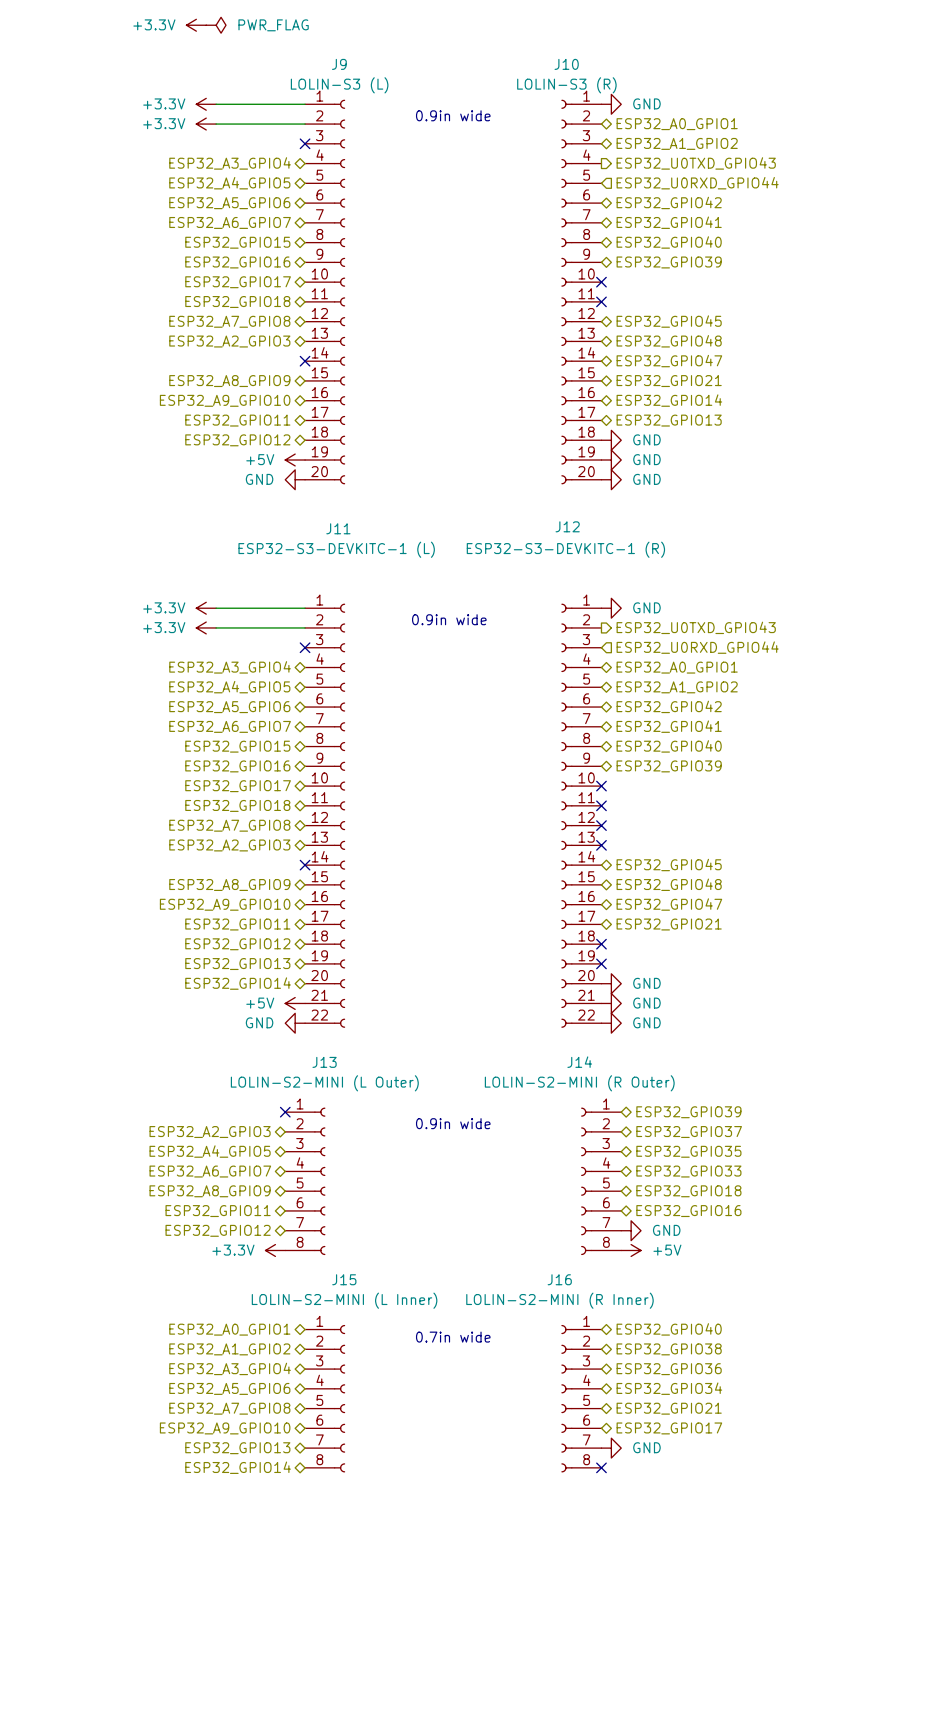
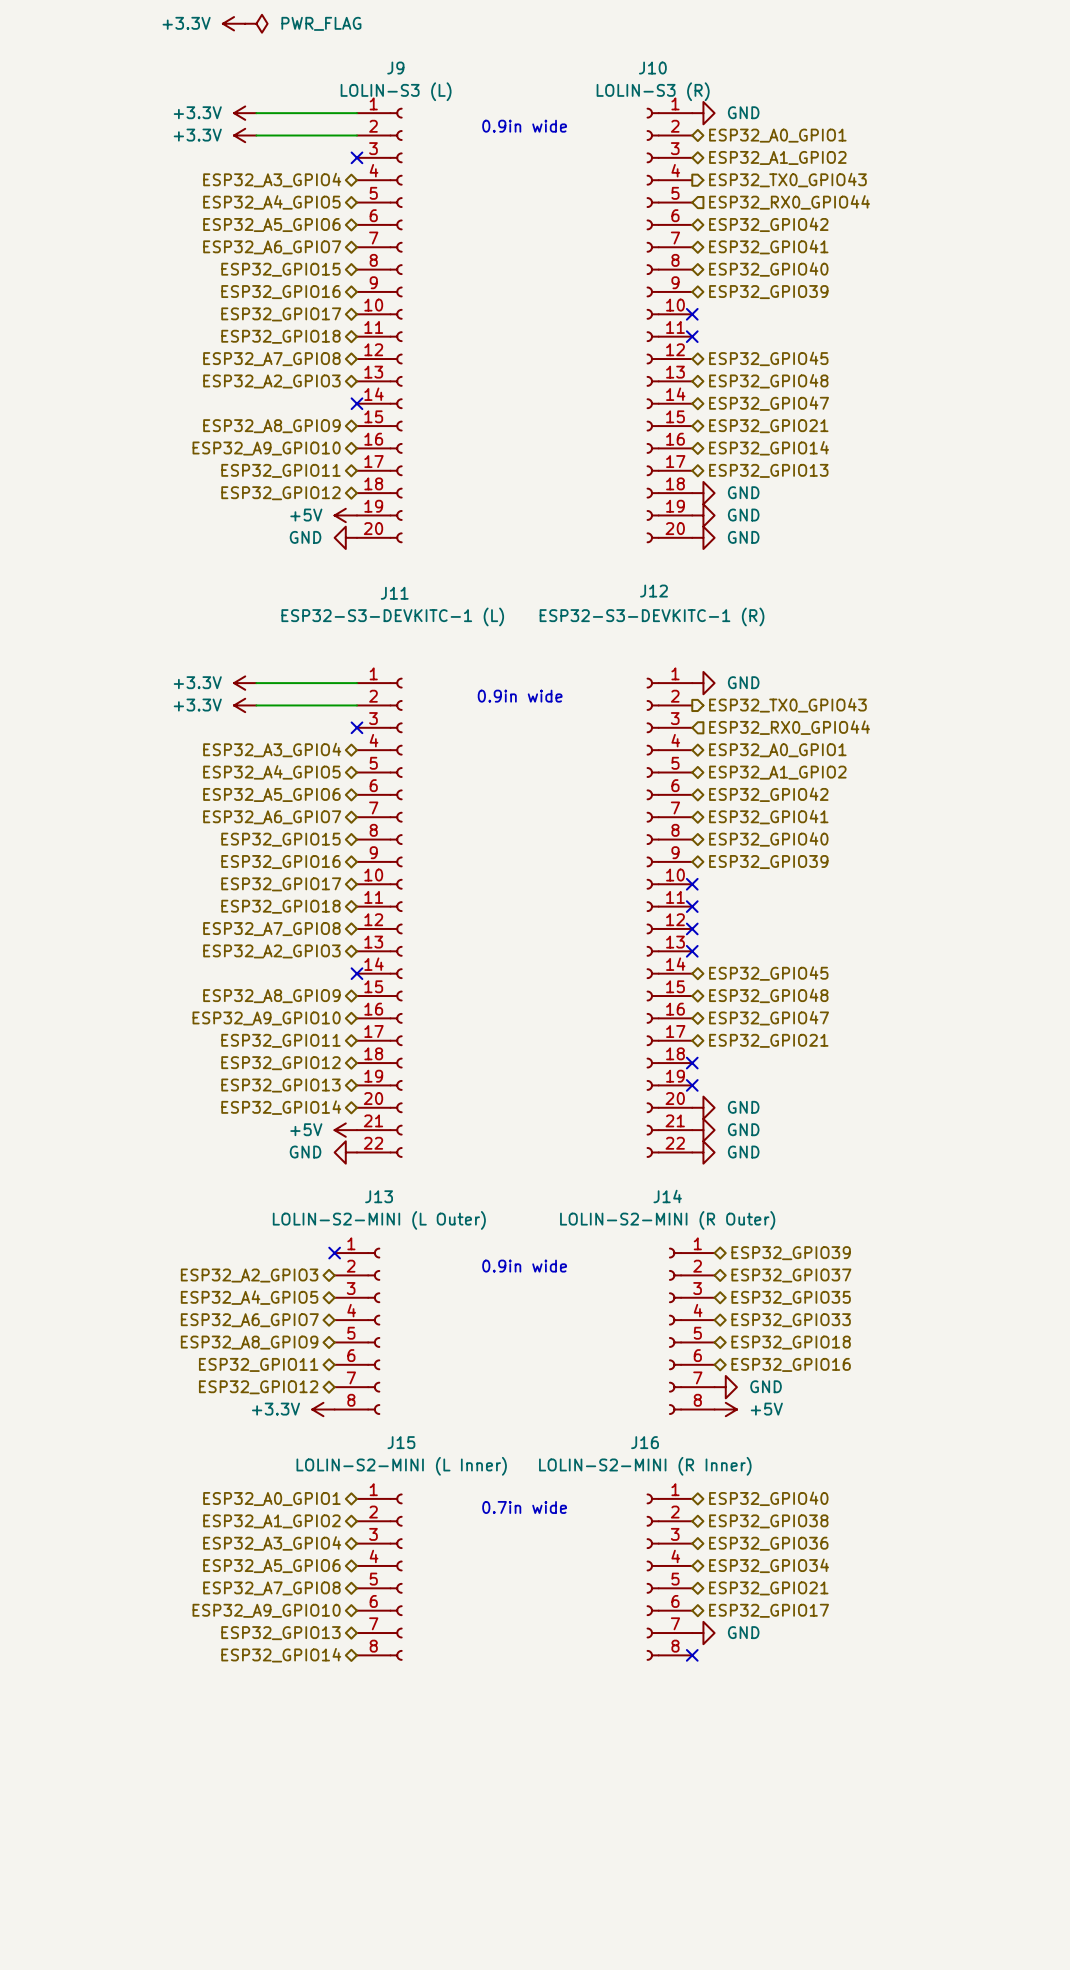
hierarchical label: ESP32_U0TXD_GPIO43 (696, 163) -> ESP32_TX0_GPIO43 (787, 180)
hierarchical label: ESP32_U0RXD_GPIO44 (697, 183) -> ESP32_RX0_GPIO44 (789, 202)
hierarchical label: ESP32_U0TXD_GPIO43 (696, 627) -> ESP32_TX0_GPIO43 (787, 705)
hierarchical label: ESP32_U0RXD_GPIO44 (697, 647) -> ESP32_RX0_GPIO44 (789, 727)

